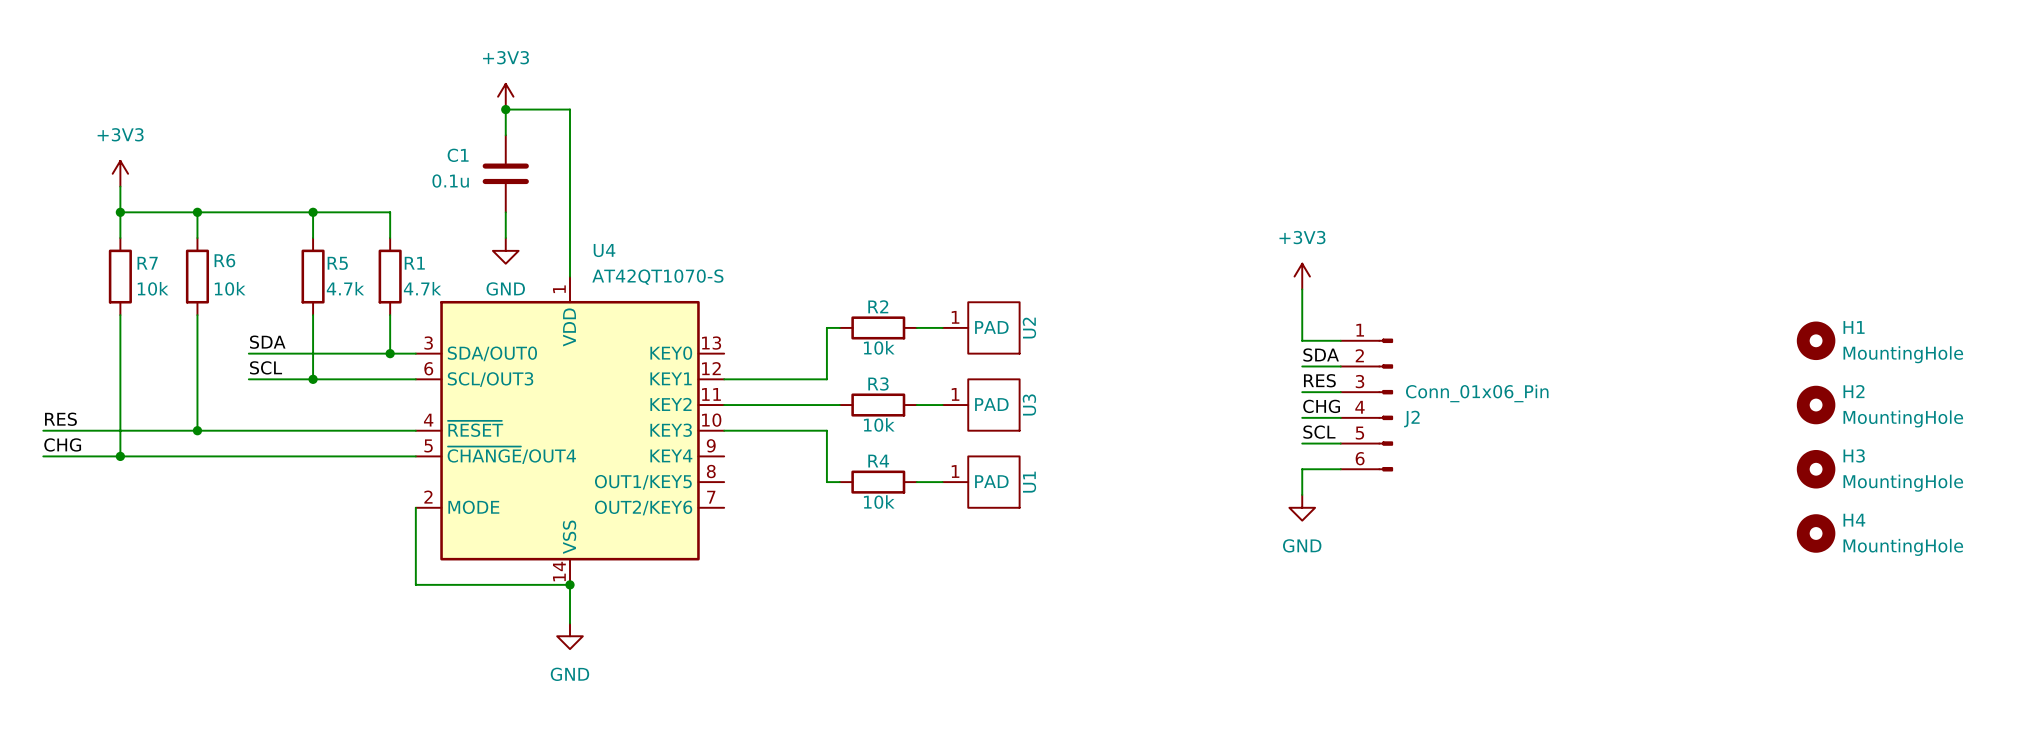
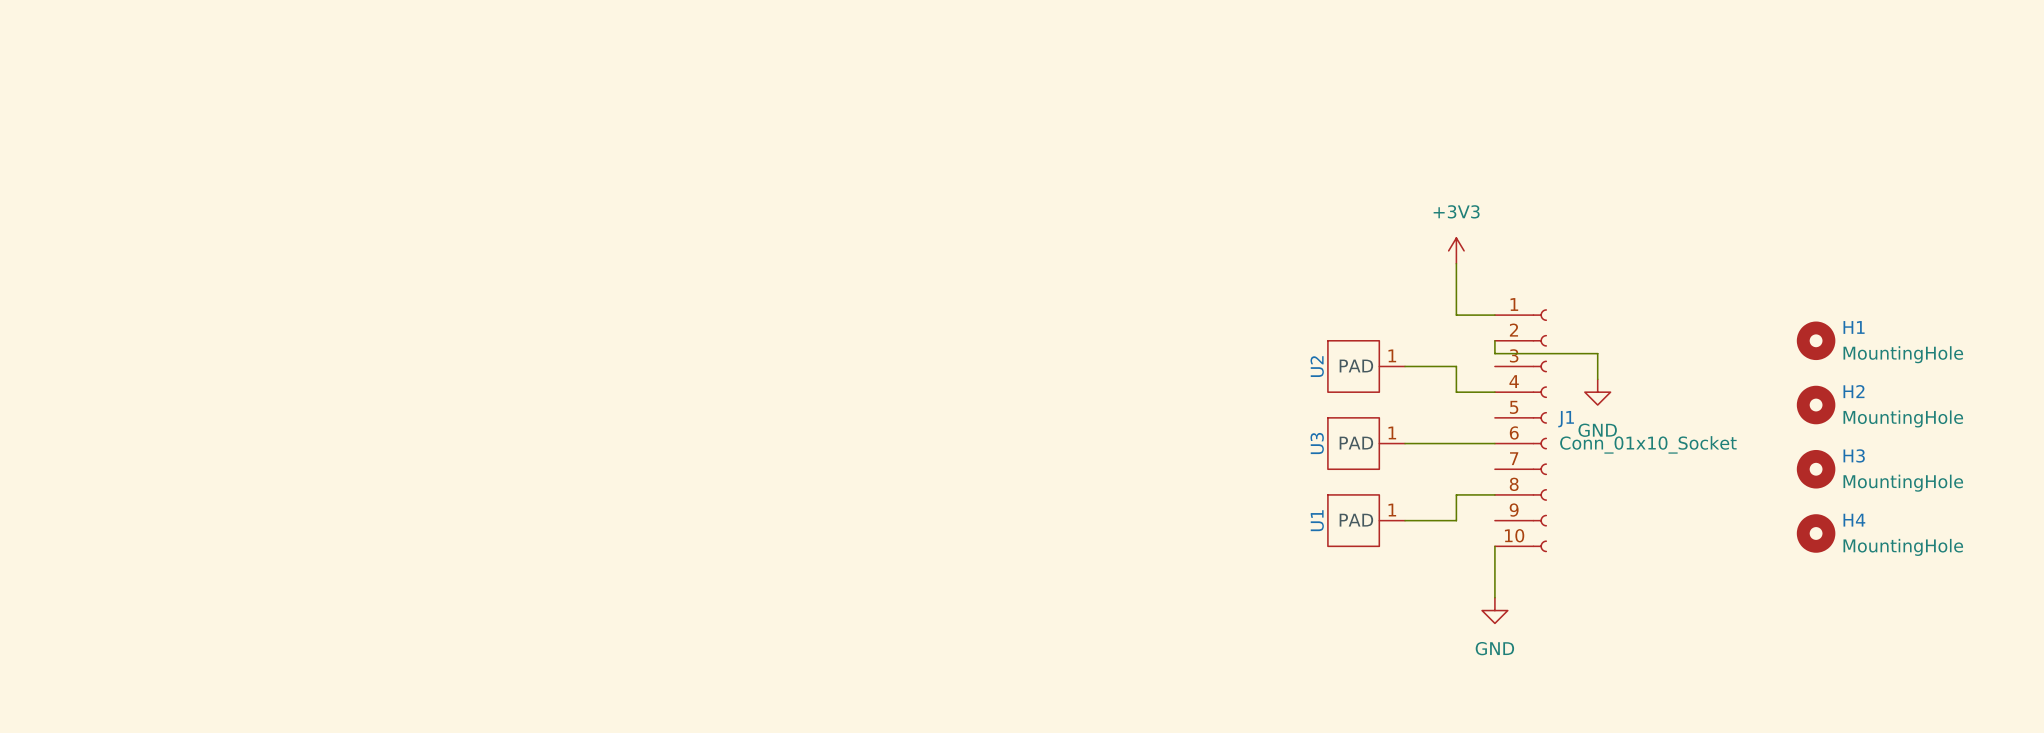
power symbol: +3V3 (505, 96) -> none
junction: (505, 109) -> none
wire: (505, 135) (505, 109) (570, 109) (570, 276) -> none
power symbol: +3V3 (120, 173) -> none
C1: 0.1u (505, 173) -> none
wire: (120, 186) (120, 238) -> none
wire: (120, 212) (390, 212) (390, 238) -> none
junction: (120, 212) -> none
wire: (197, 212) (197, 238) -> none
junction: (197, 212) -> none
wire: (313, 212) (313, 238) -> none
junction: (313, 212) -> none
wire: (505, 212) (505, 238) -> none
power symbol: GND (505, 250) -> none
R7: 10k (120, 276) -> none
R6: 10k (197, 276) -> none
R5: 4.7k (313, 276) -> none
R1: 4.7k (390, 276) -> none
power symbol position: +3V3 (1302, 276) -> +3V3 (1456, 250)
wire: (1302, 289) (1302, 340) (1340, 340) -> (1456, 263) (1456, 315) (1494, 315)
wire: (120, 315) (120, 456) -> none
wire: (197, 315) (197, 430) -> none
wire: (313, 315) (313, 379) -> none
wire: (390, 315) (390, 353) -> none
wire: (839, 327) (826, 327) (826, 379) (724, 379) -> none
R2: 10k (878, 327) -> none
wire: (916, 327) (942, 327) -> none
U2 position: (981, 327) -> (1366, 366)
U2 rotation: 0° (993, 327) -> 180° (1353, 366)
wire: none -> (1494, 340) (1494, 353) (1597, 353) (1597, 379)
label: SDA (267, 342) -> none
wire: (248, 353) (415, 353) -> none
junction: (390, 353) -> none
label: SDA (1321, 355) -> none
wire: (1302, 366) (1340, 366) -> none
wire: none -> (1405, 366) (1456, 366) (1456, 392) (1494, 392)
label: SCL (266, 367) -> none
wire: (248, 379) (415, 379) -> none
junction: (313, 379) -> none
label: RES (1319, 380) -> none
wire: (1302, 392) (1340, 392) -> none
power symbol: none -> GND (1597, 392)
wire: (724, 405) (839, 405) -> none
R3: 10k (878, 405) -> none
wire: (916, 405) (942, 405) -> none
U3 position: (981, 405) -> (1366, 443)
U3 rotation: 0° (993, 405) -> 180° (1353, 443)
J2: Conn_01x06_Pin (1366, 405) -> none
label: CHG (1321, 406) -> none
wire: (1302, 417) (1340, 417) -> none
label: RES (60, 419) -> none
wire: (43, 430) (415, 430) -> none
junction: (197, 430) -> none
U4: AT42QT1070-S (570, 430) -> none
wire: (724, 430) (826, 430) (826, 482) (839, 482) -> none
J1: none -> Conn_01x10_Socket (1521, 430)
label: SCL (1319, 432) -> none
wire: (1302, 443) (1340, 443) -> none
wire: none -> (1405, 443) (1494, 443)
label: CHG (62, 444) -> none
wire: (43, 456) (415, 456) -> none
junction: (120, 456) -> none
wire: (1340, 469) (1302, 469) (1302, 494) -> none
R4: 10k (878, 482) -> none
wire: (916, 482) (942, 482) -> none
U1 position: (981, 482) -> (1366, 520)
U1 rotation: 0° (993, 482) -> 180° (1353, 520)
wire: none -> (1494, 494) (1456, 494) (1456, 520) (1405, 520)
wire: (415, 507) (415, 584) (570, 584) (570, 623) -> none
power symbol: GND (1302, 507) -> none
wire: none -> (1494, 546) (1494, 597)
junction: (570, 584) -> none
power symbol: none -> GND (1494, 610)
power symbol: GND (570, 636) -> none

